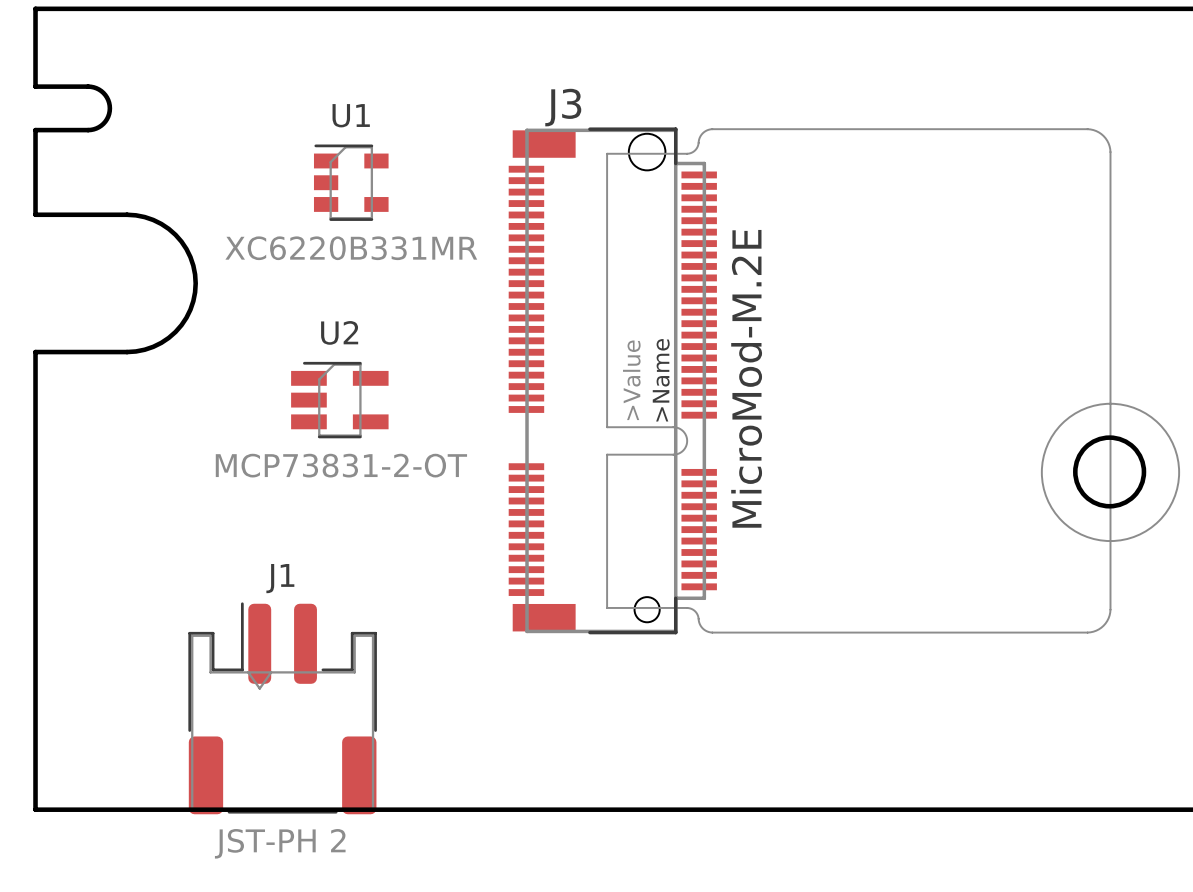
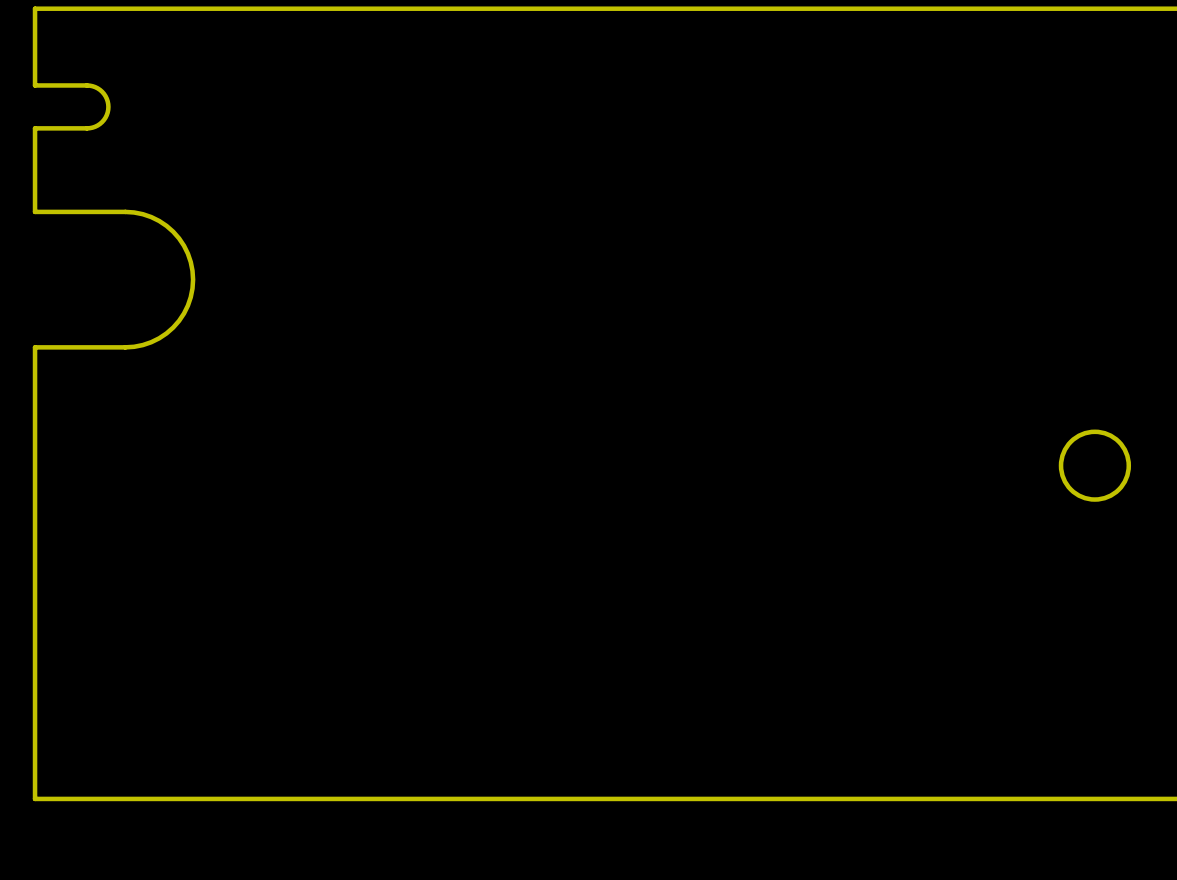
U1: XC6220B331MR (351, 182) -> none
J3: MicroMod-M.2E (844, 380) -> none
U2: MCP73831-2-OT (339, 400) -> none
J1: JST-PH 2 (282, 708) -> none

